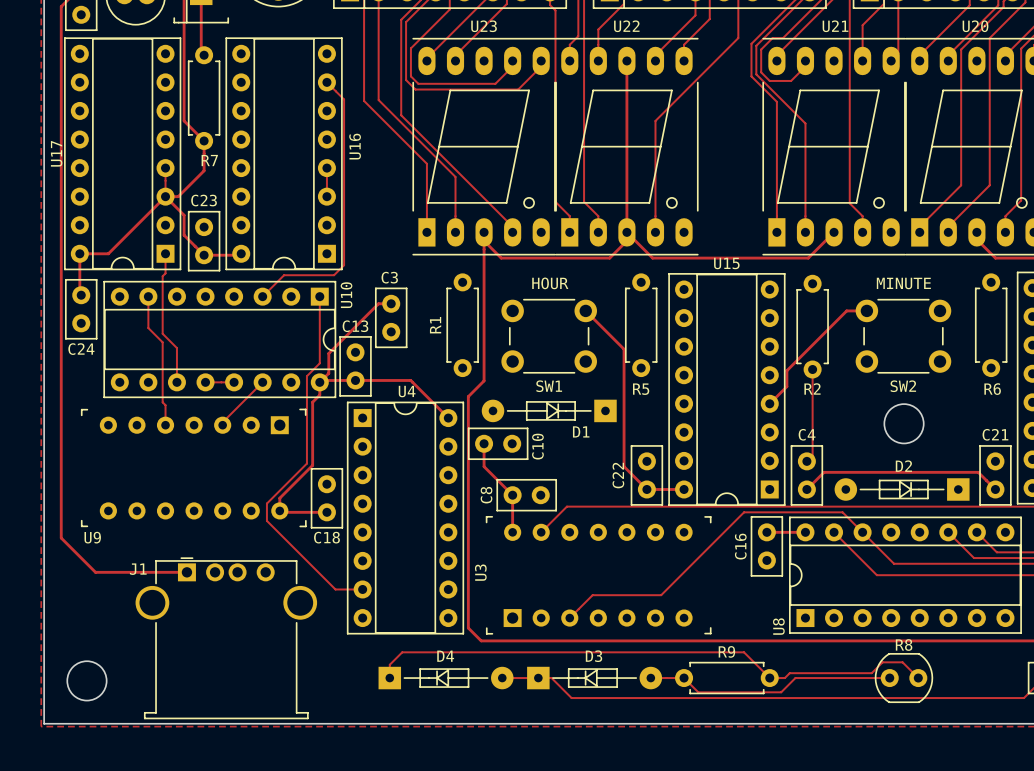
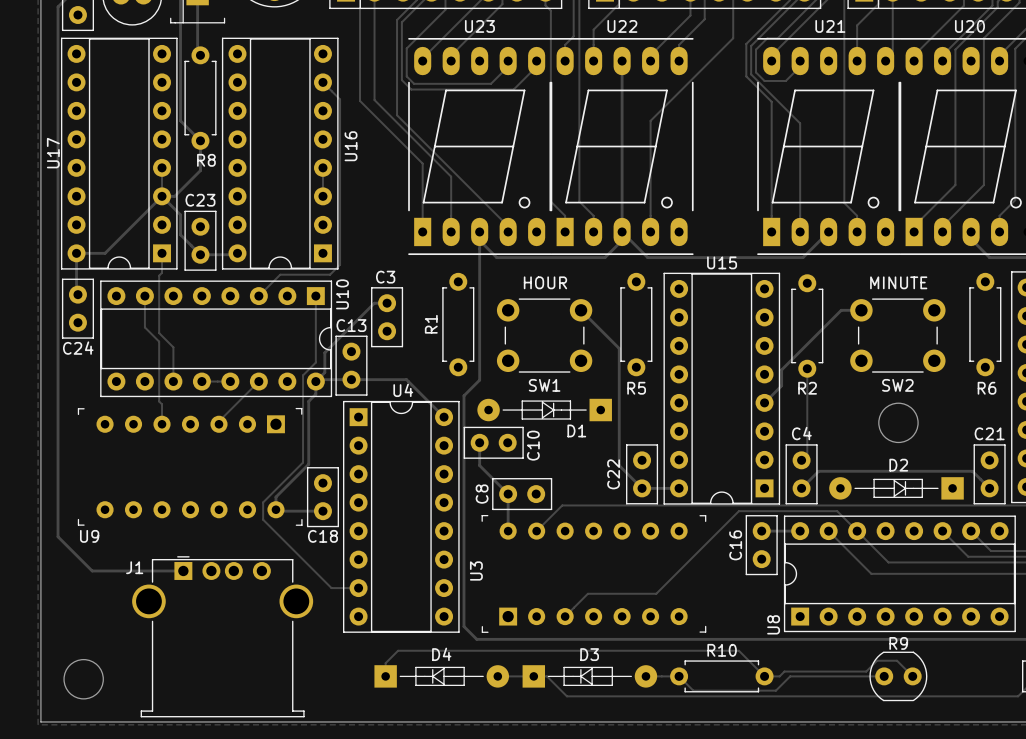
R7 name: R7 (209, 160) -> R8 (206, 160)
R8 name: R8 (904, 645) -> R9 (898, 643)
R9 name: R9 (726, 651) -> R10 (722, 650)

